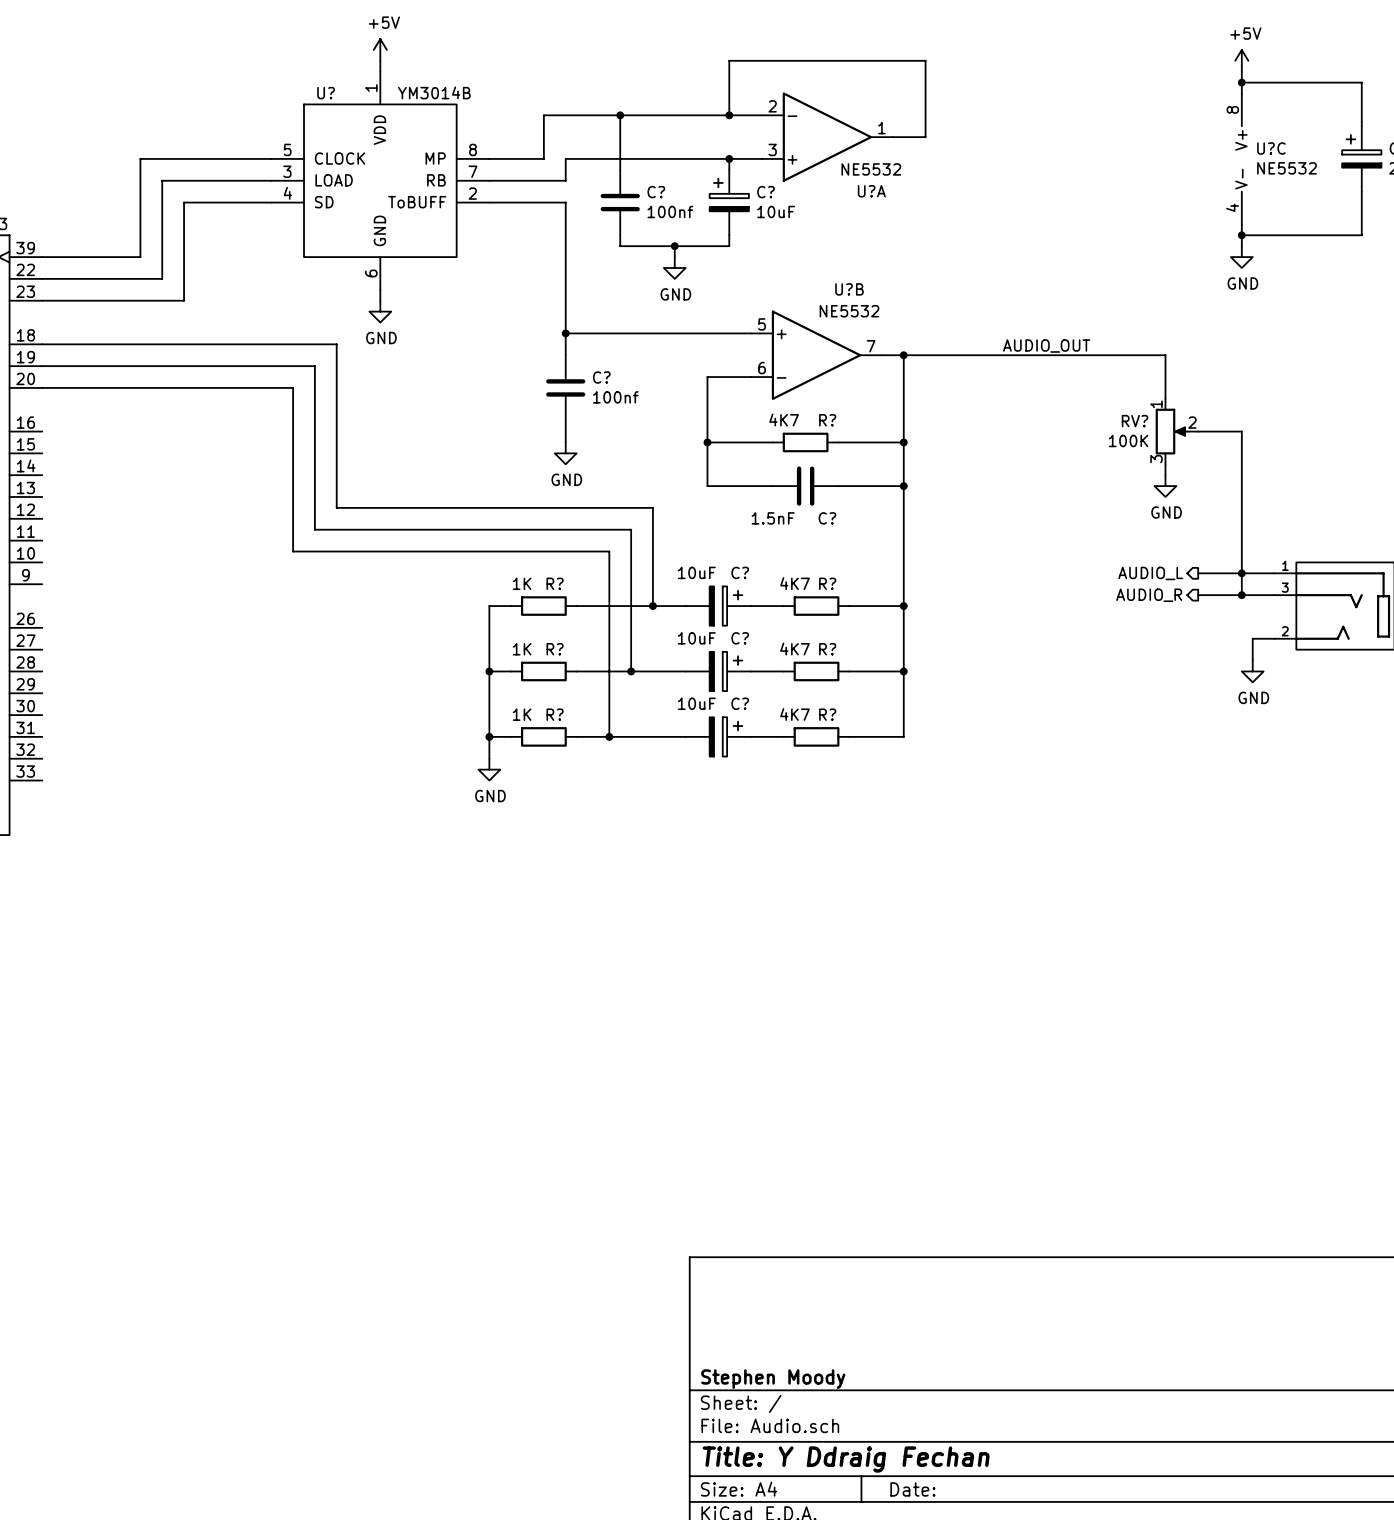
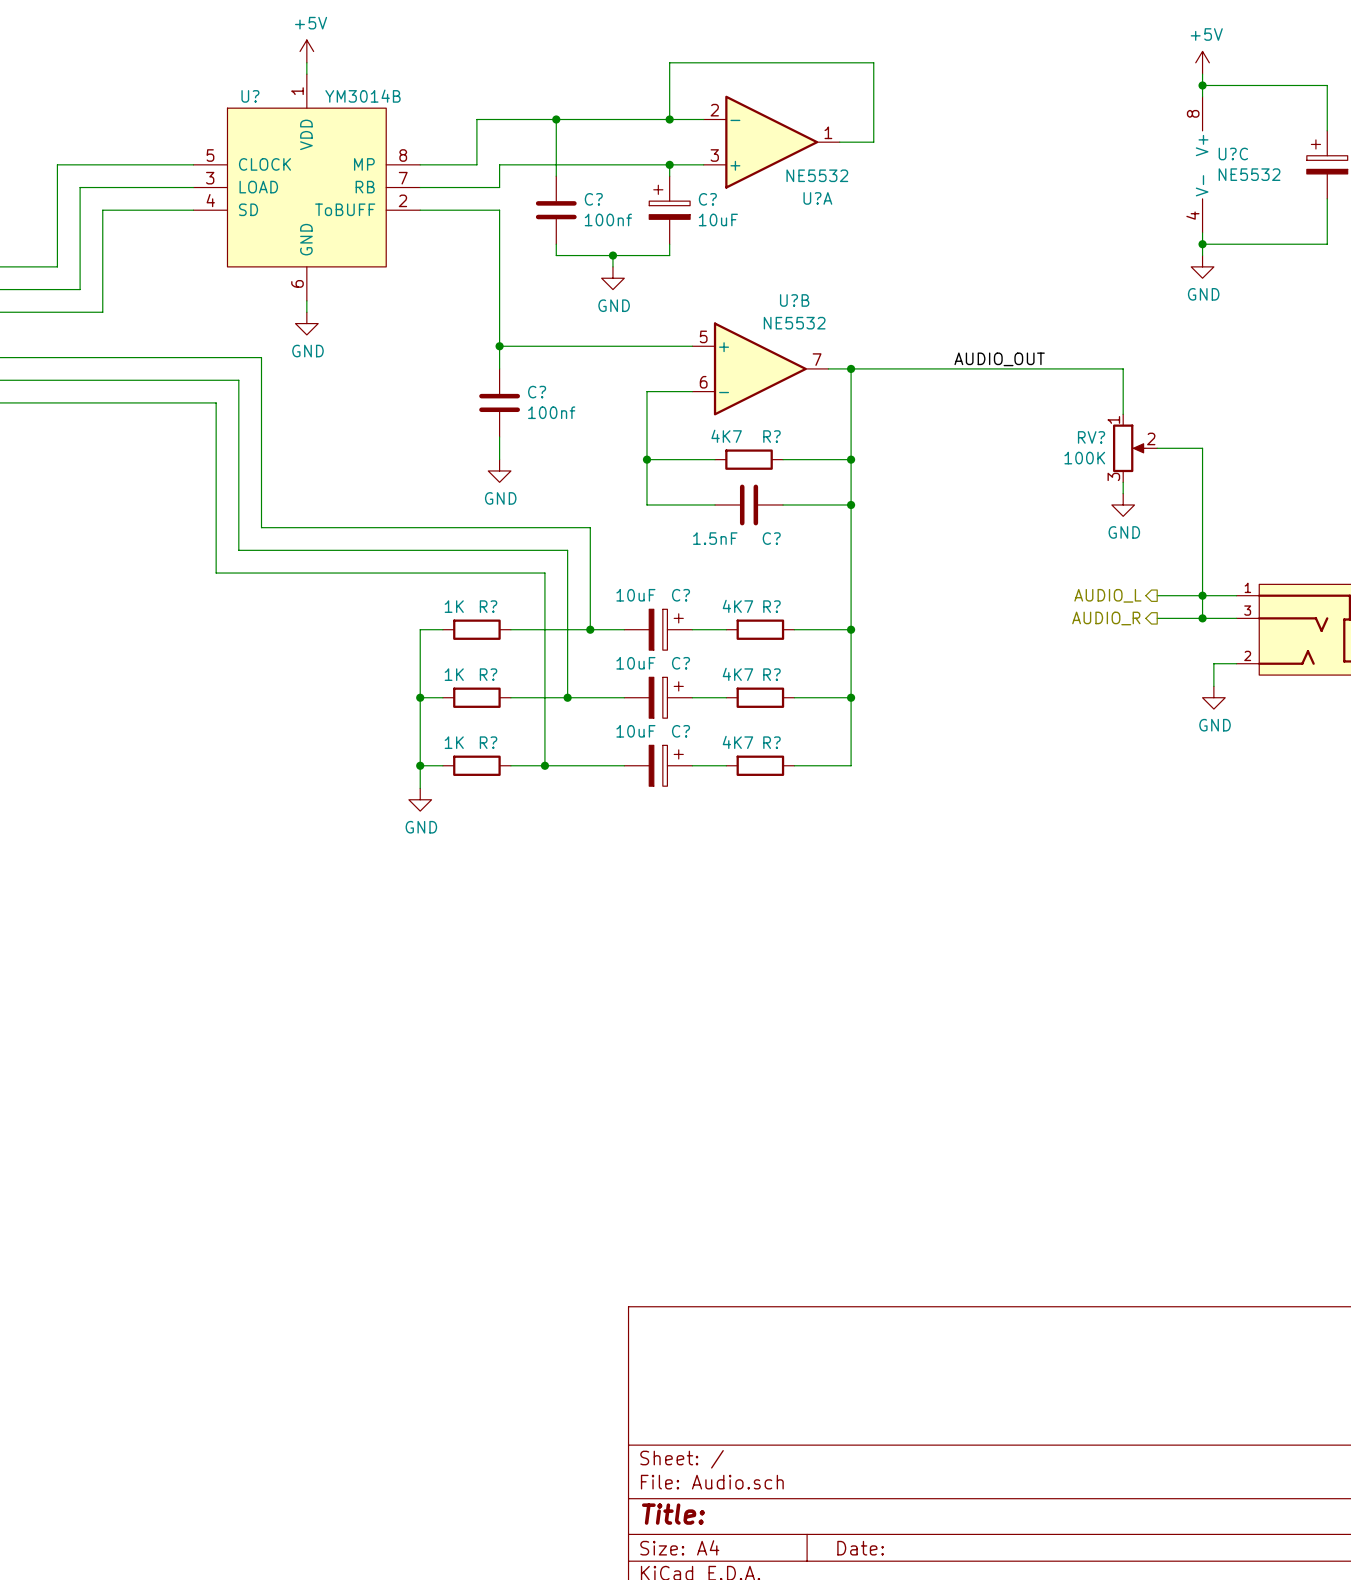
title block: Stephen Moody (773, 1379) -> none
title block: Title: Y Ddraig Fechan (846, 1459) -> Title: (673, 1514)

